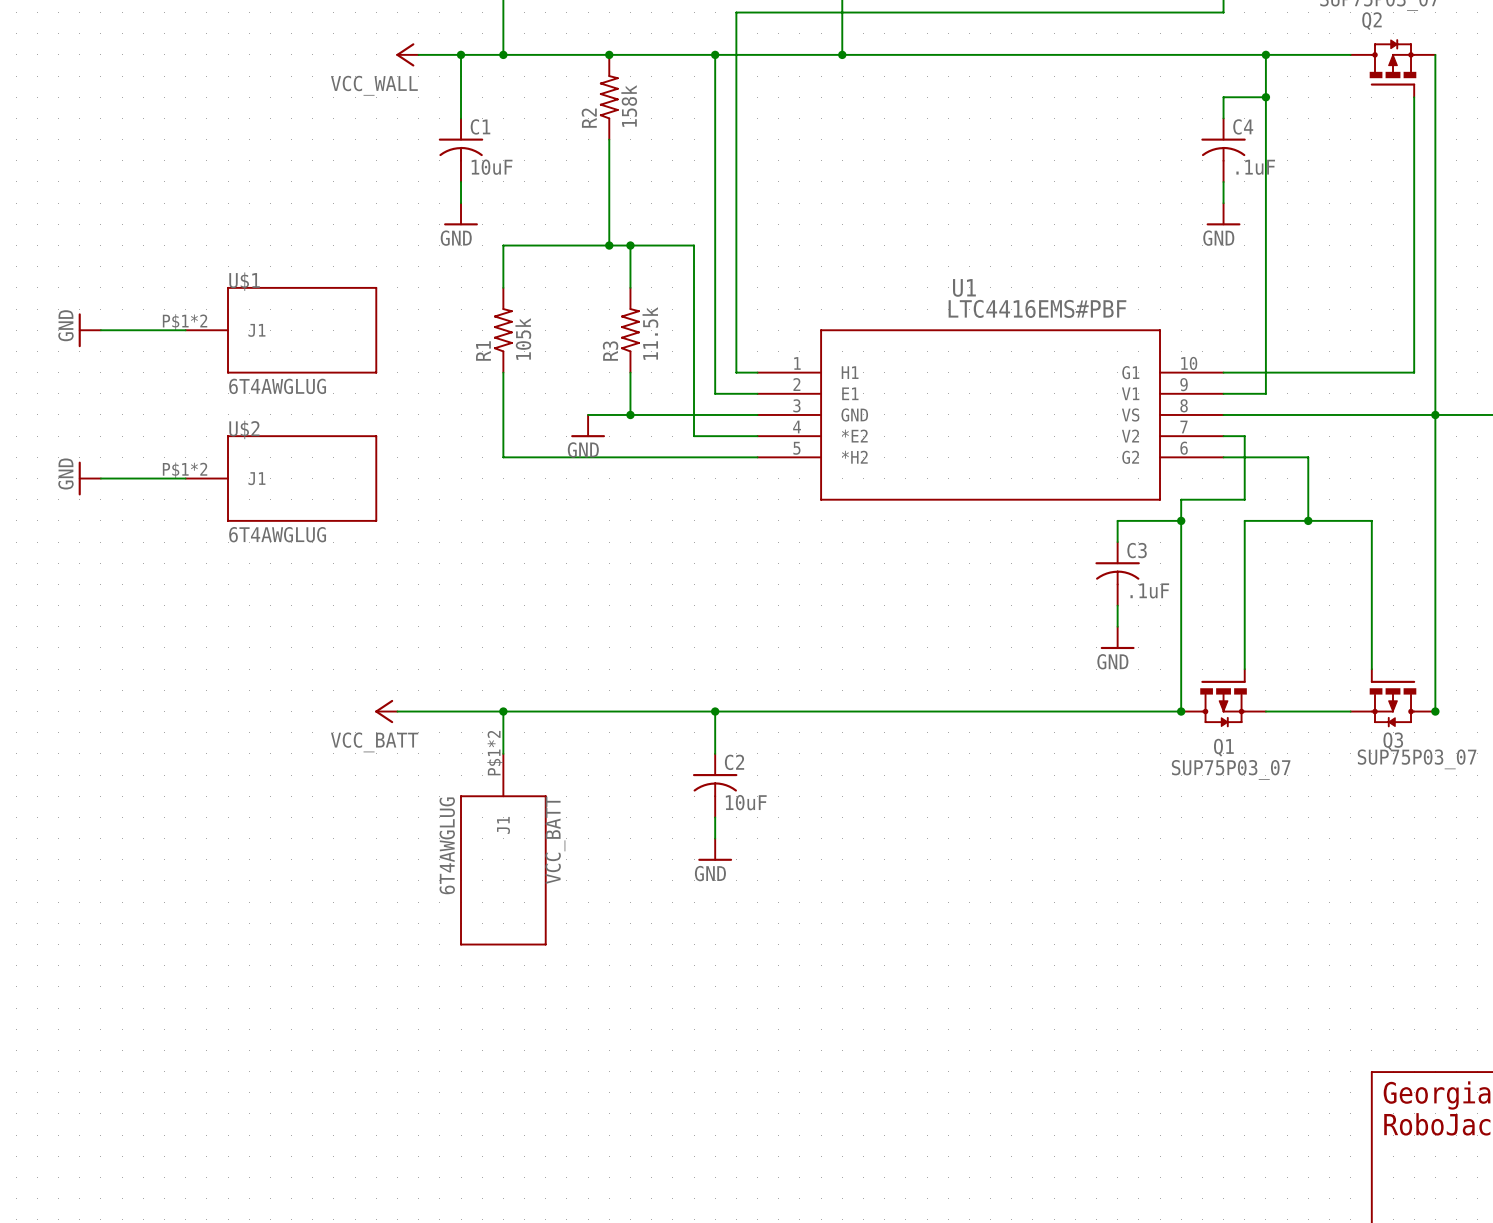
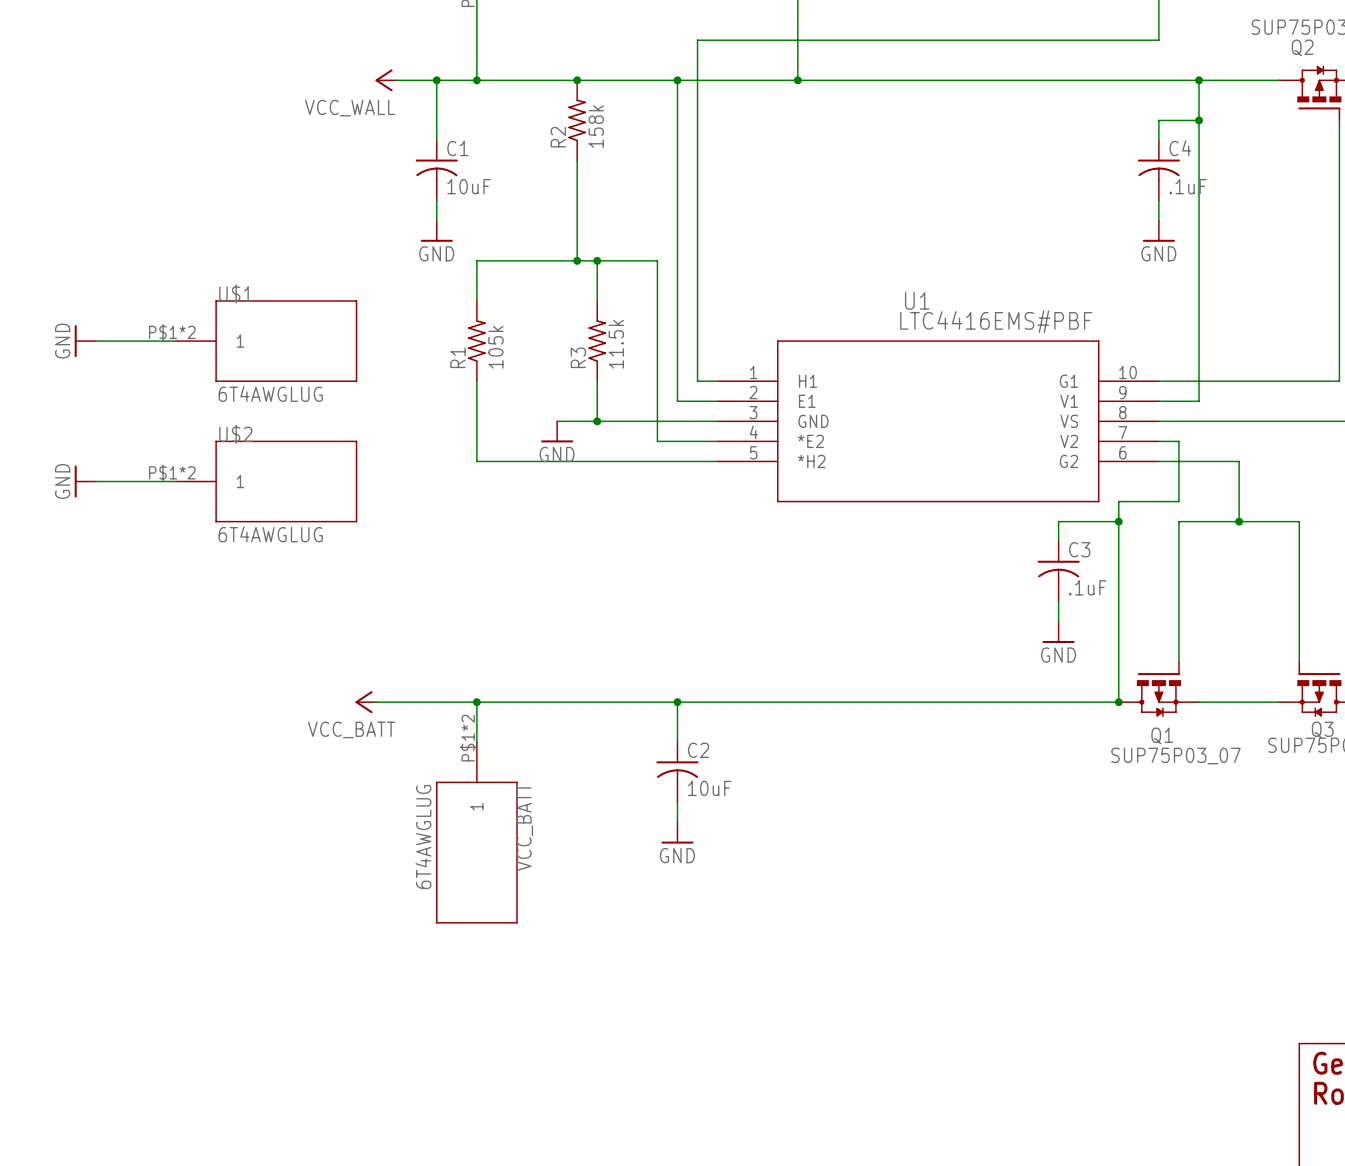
U$1 pin name: J1 (256, 330) -> 1 (240, 341)
U$2 pin name: J1 (256, 478) -> 1 (240, 481)
VCC_BATT pin name: J1 (503, 825) -> 1 (476, 806)

